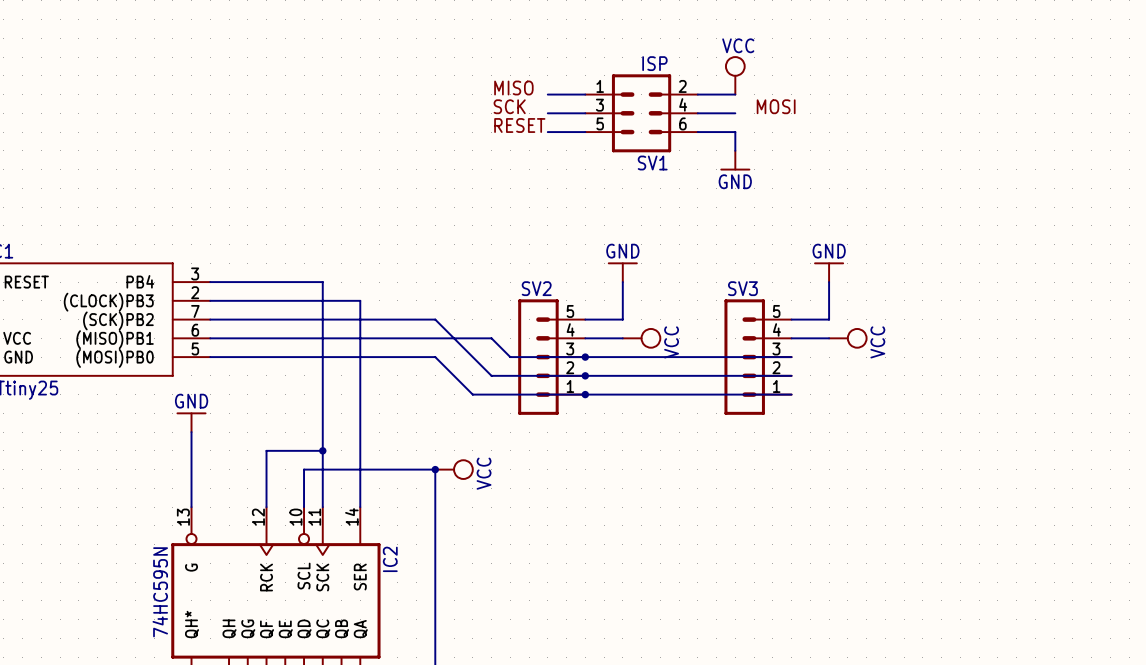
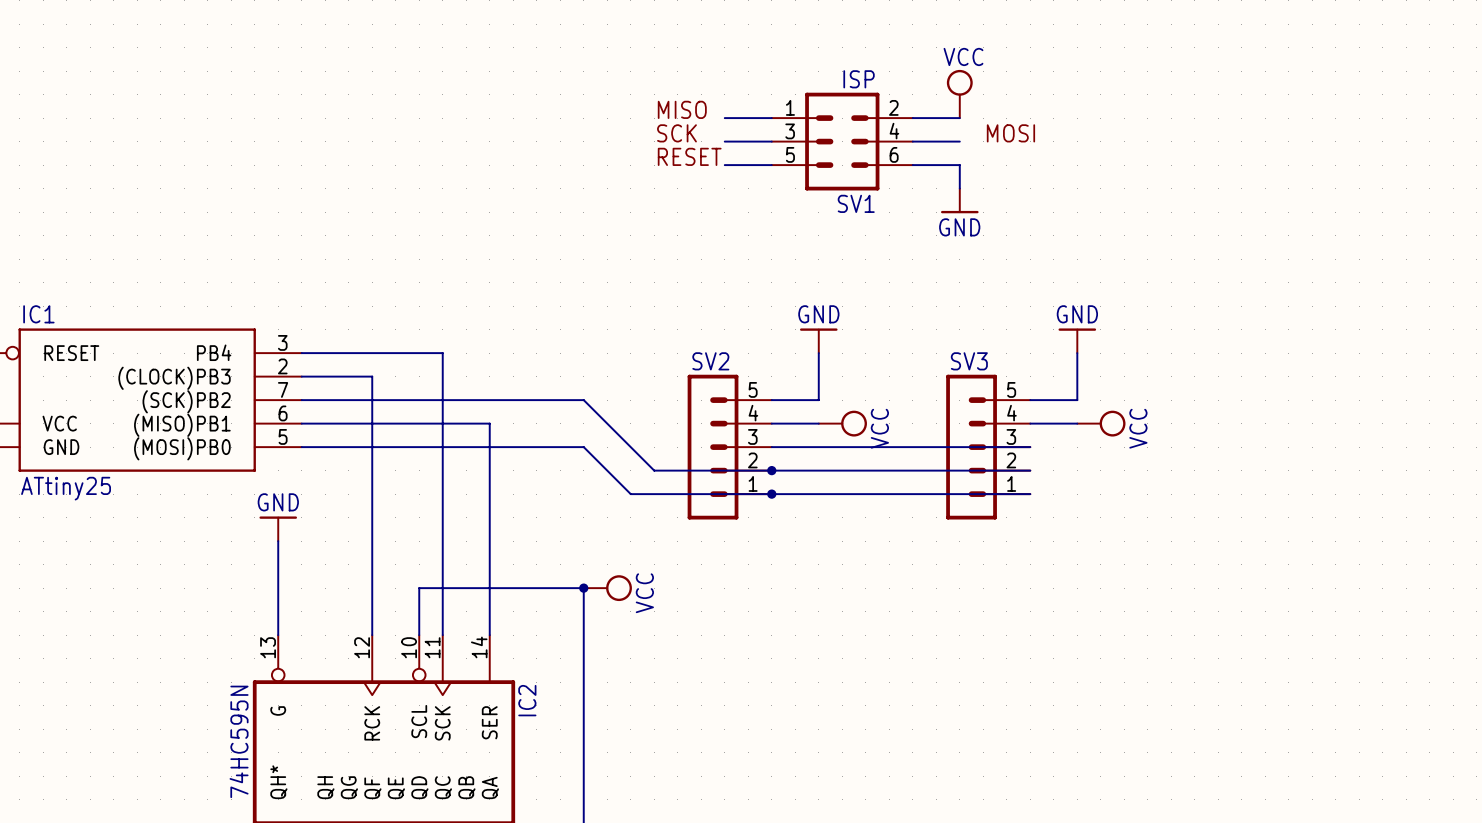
wire: (266, 300) (360, 300) (360, 338) (491, 338) (510, 357) (585, 357) -> none
junction: (585, 357) -> none
wire: (266, 450) (322, 450) -> (372, 564) (372, 376)
junction: (322, 450) -> none

